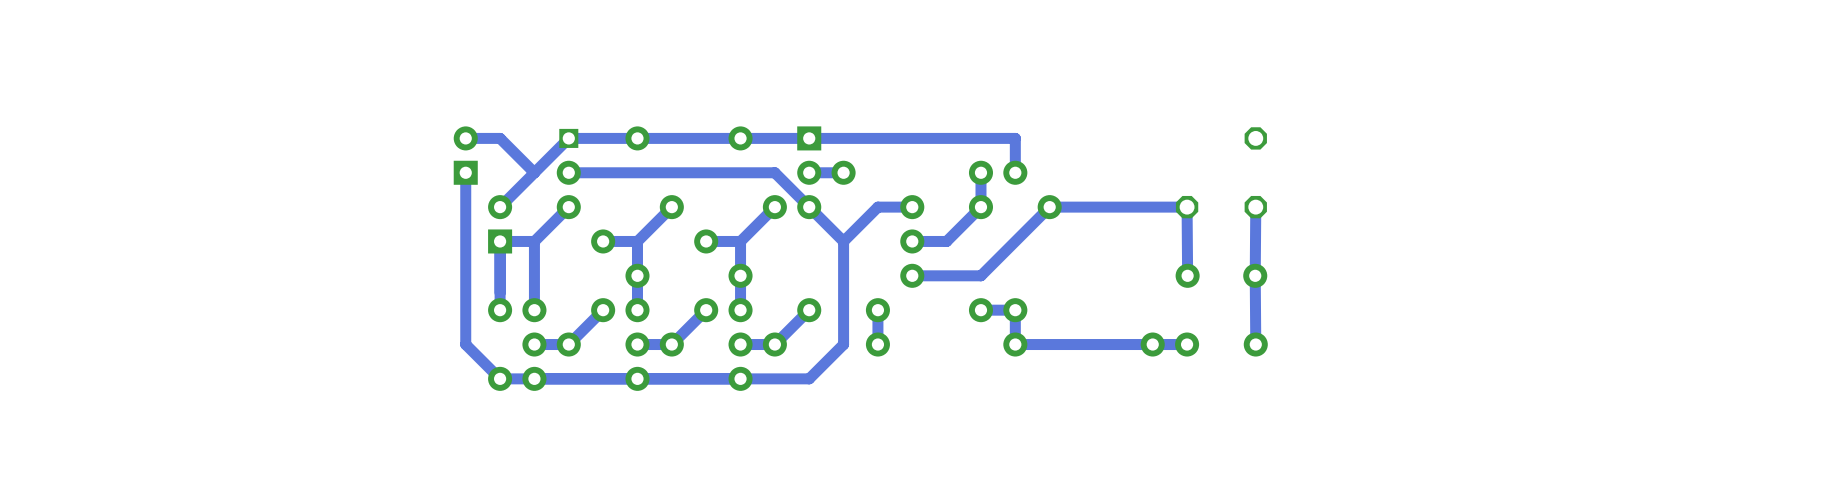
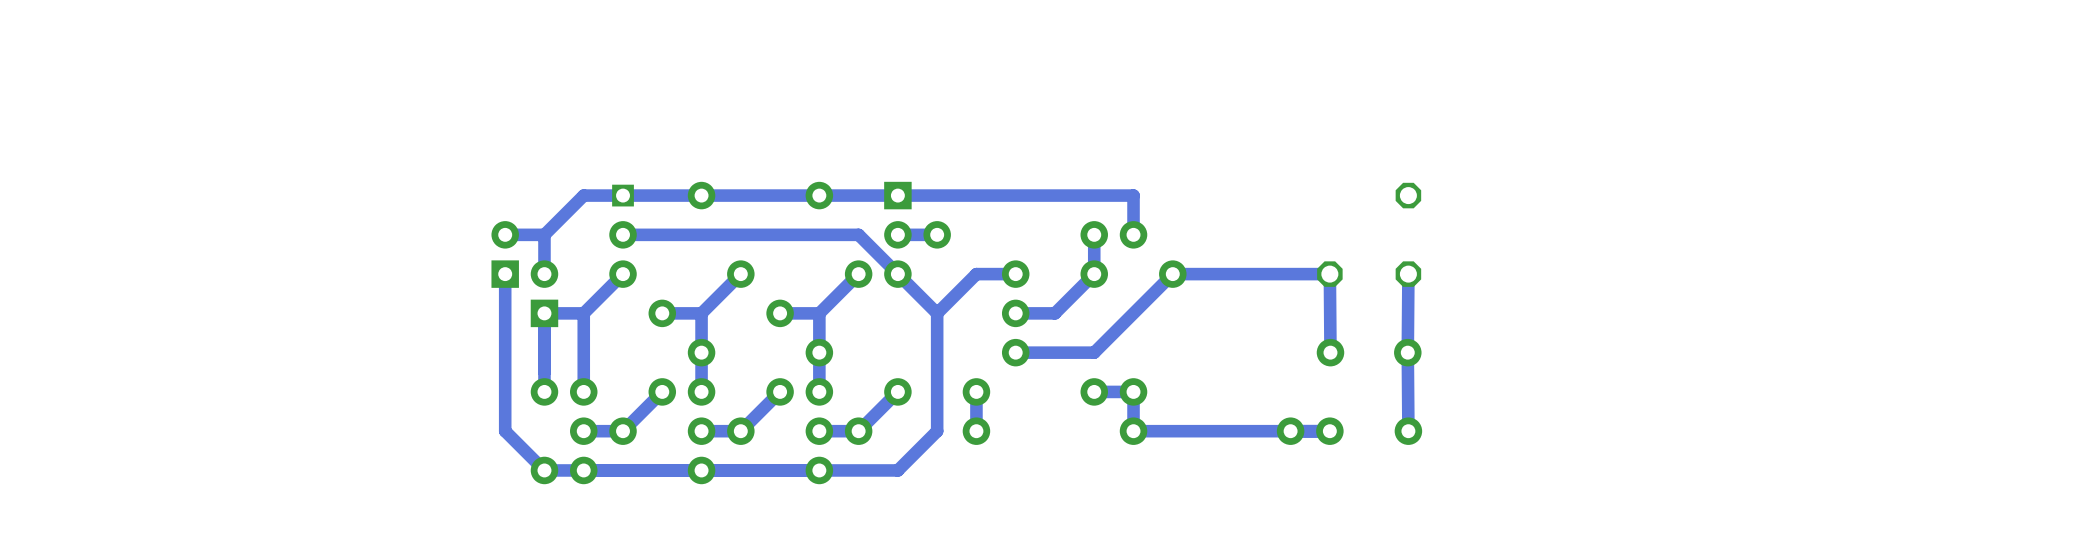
track: (465, 138) (500, 138) (534, 172) -> none
track: (568, 138) (500, 207) -> (623, 195) (583, 195) (544, 234)
part position: (465, 155) -> (505, 254)
track: (465, 172) (465, 207) -> (505, 234) (544, 234)
track: none -> (544, 234) (544, 274)

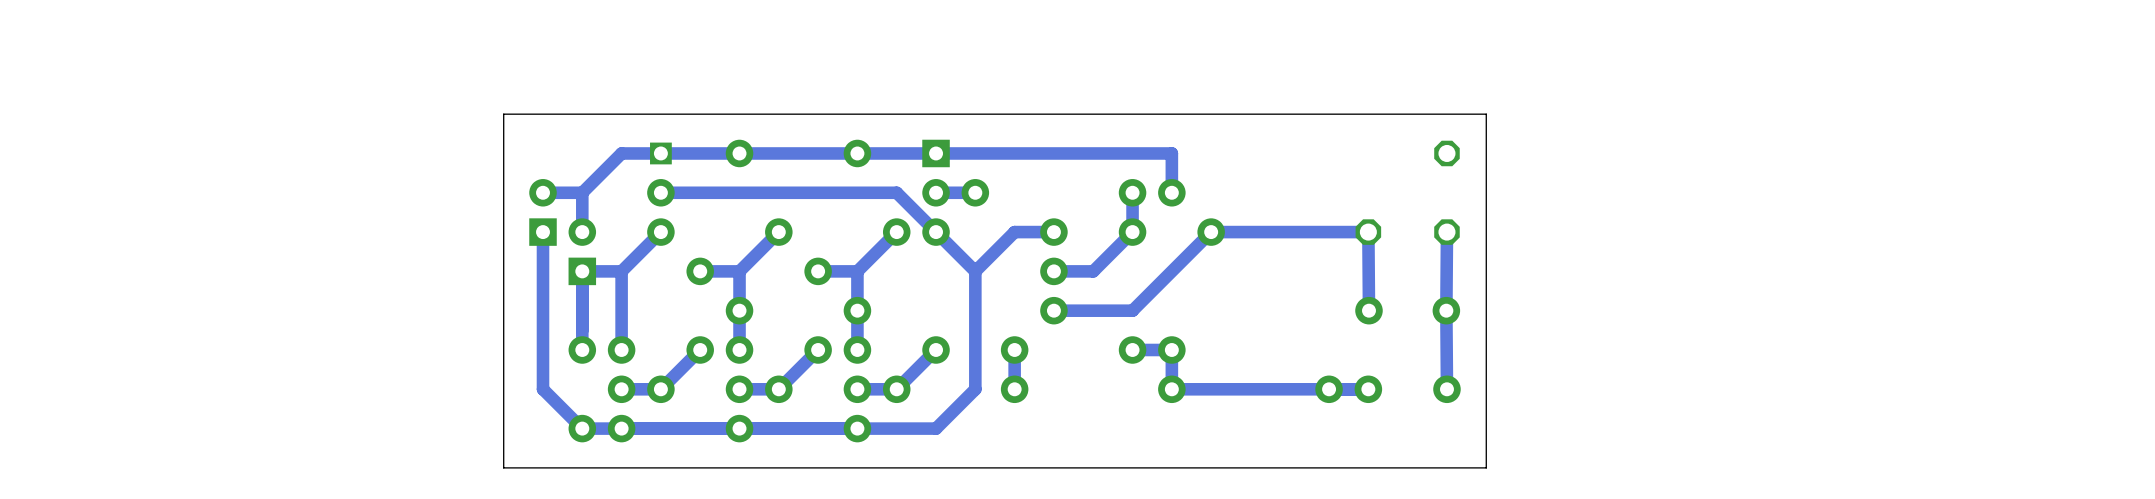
board edge: none -> (1486, 114) (503, 114) (503, 467) (1486, 467) (1486, 114)

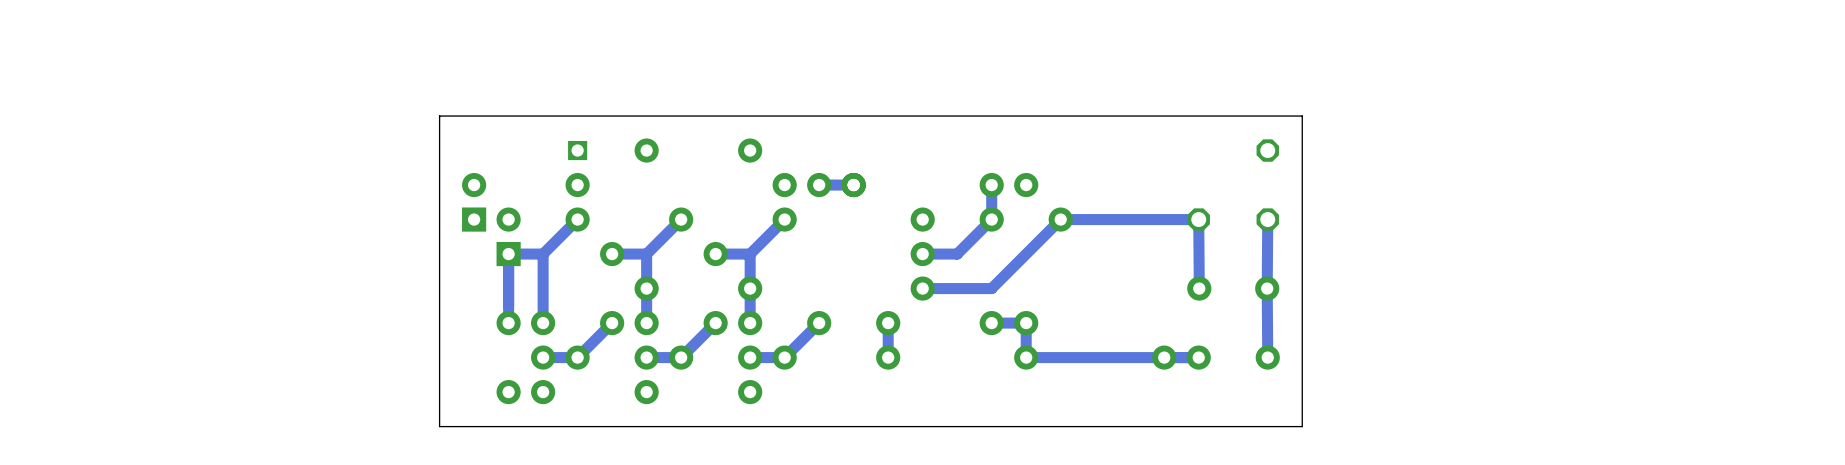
part footprint: [922, 139, 950, 246] -> [772, 172, 866, 198]
track: (582, 192) (582, 232) -> none
track: (582, 192) (543, 192) -> none
track: (660, 192) (896, 192) (975, 271) -> none
track: (1171, 192) (1171, 153) (621, 153) (582, 192) -> none
track: (543, 232) (543, 389) (582, 428) (936, 428) (975, 389) (975, 271) -> none
track: (1053, 232) (1014, 232) (975, 271) -> none

